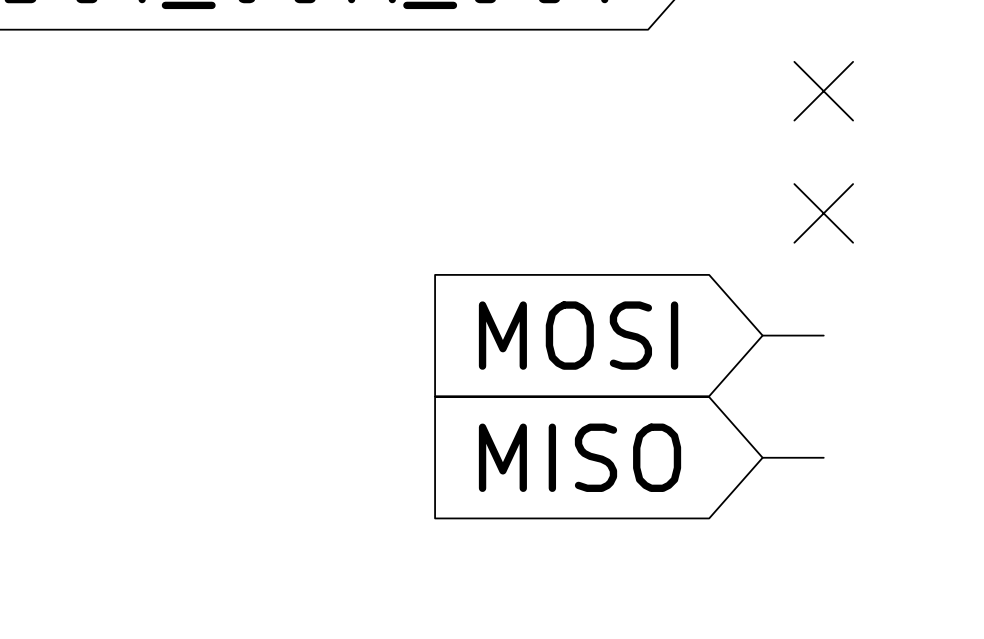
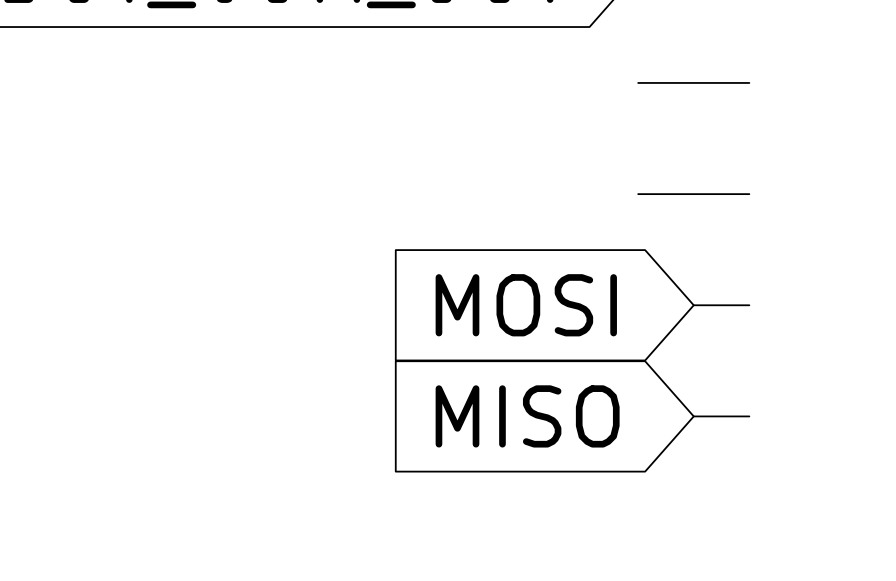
wire: none -> (638, 82) (749, 82)
no-connect mark: (823, 91) -> none
wire: none -> (638, 194) (749, 194)
no-connect mark: (823, 213) -> none

